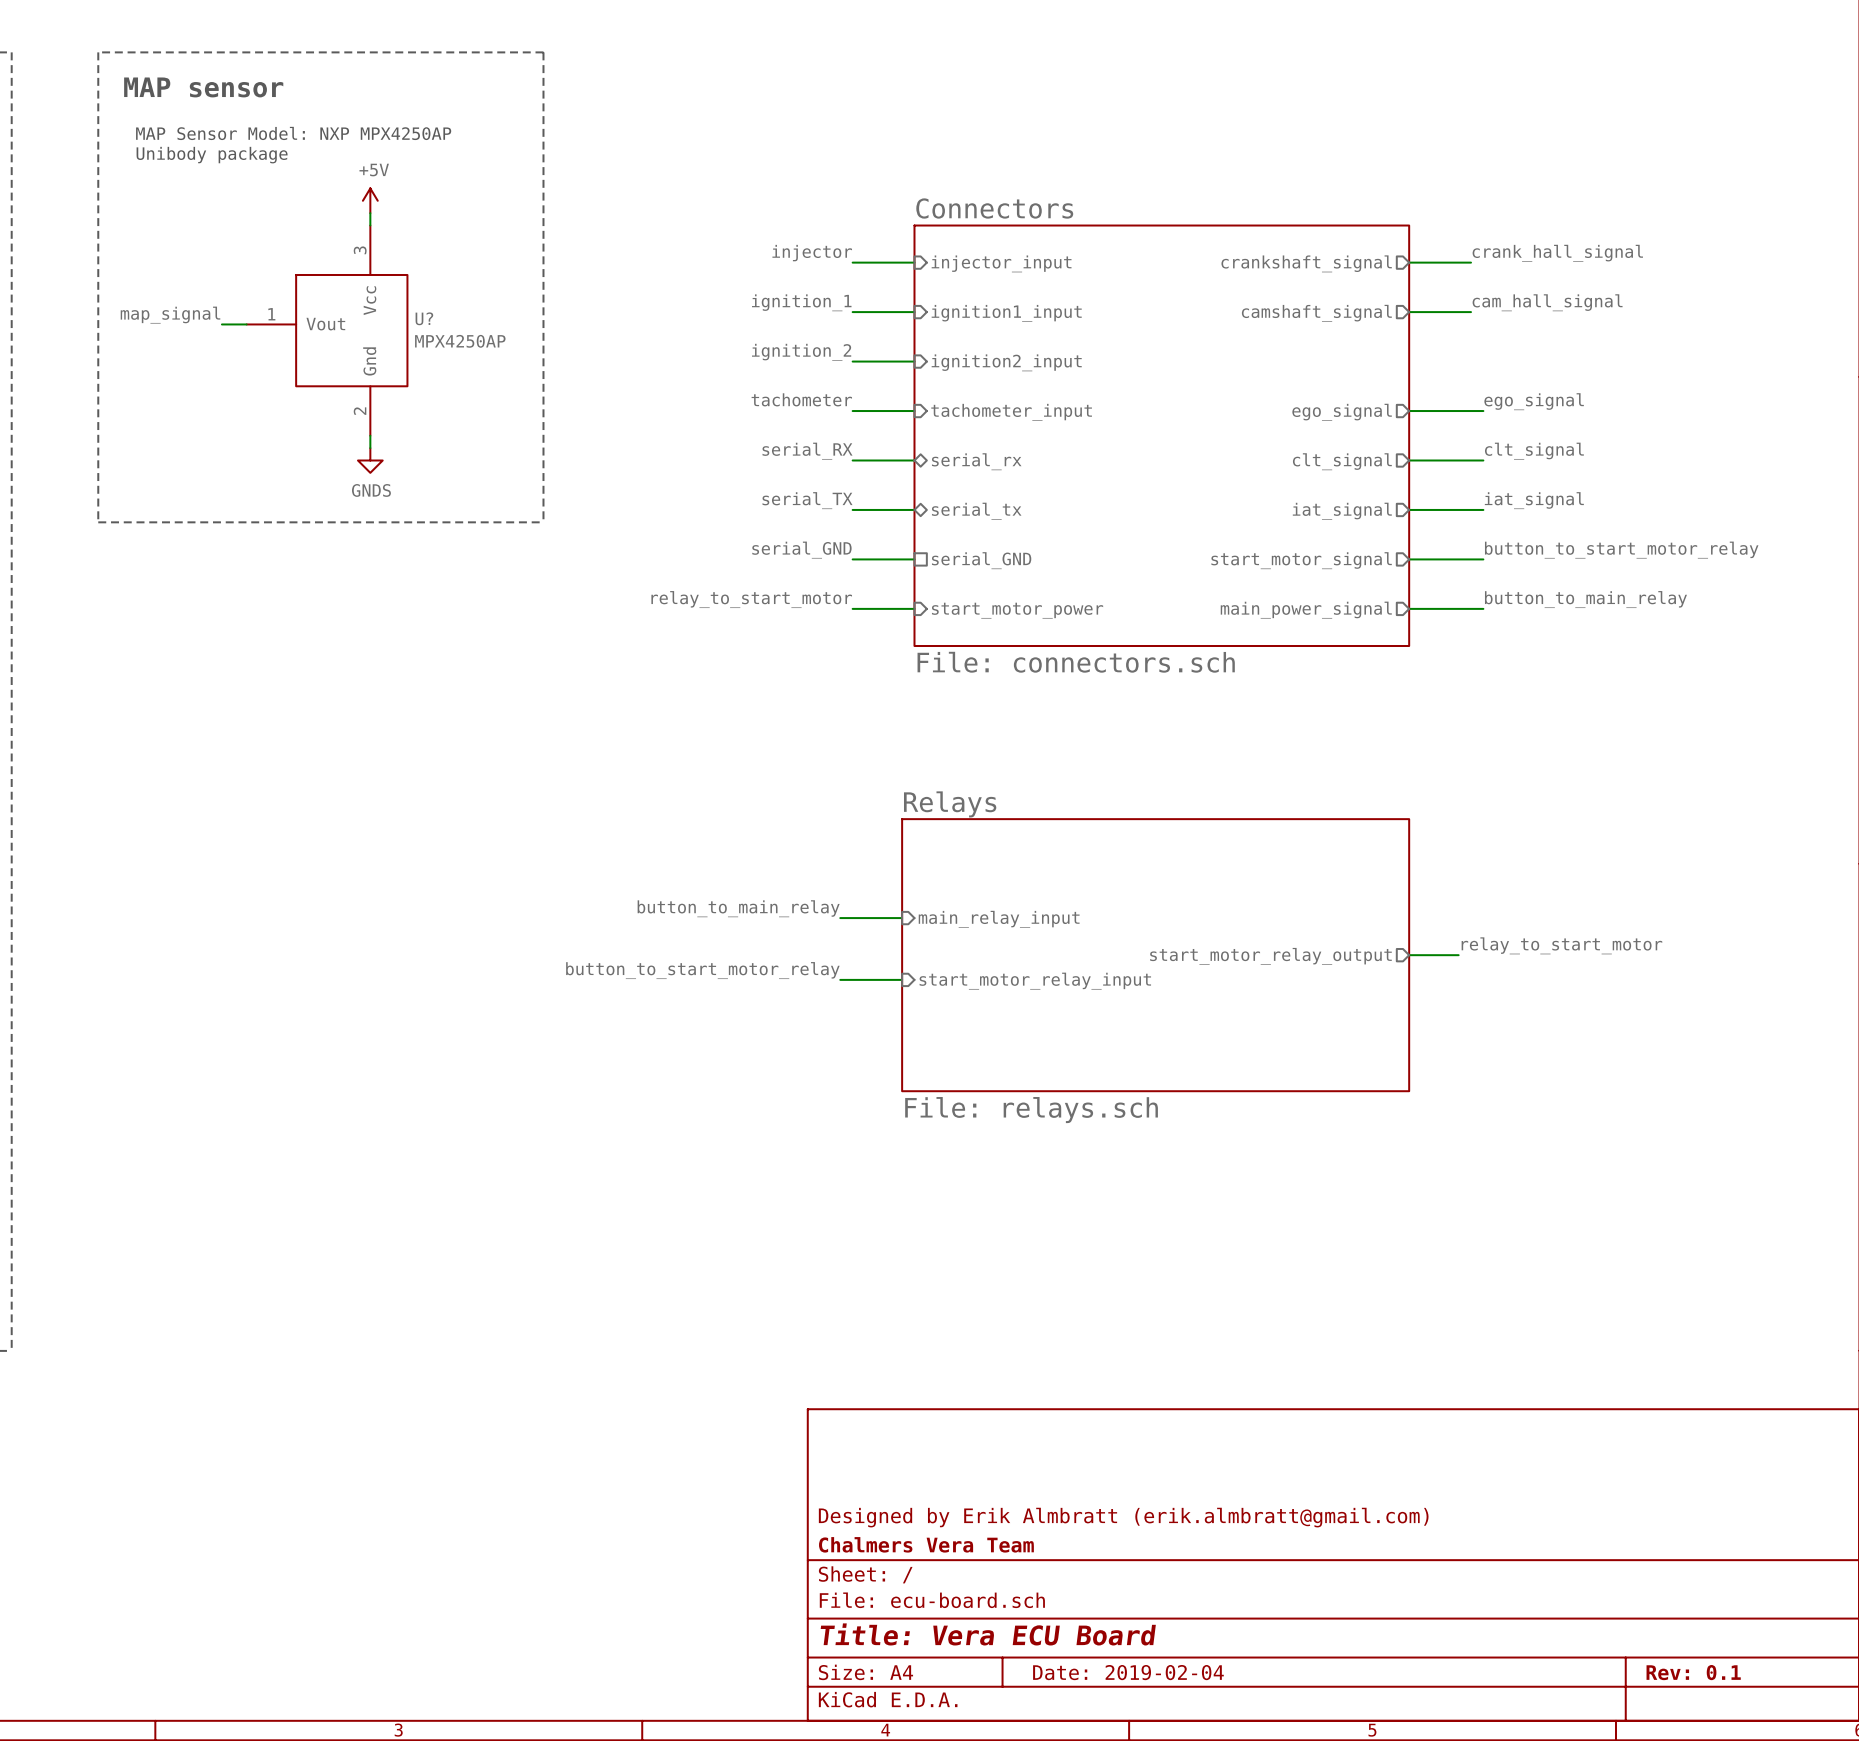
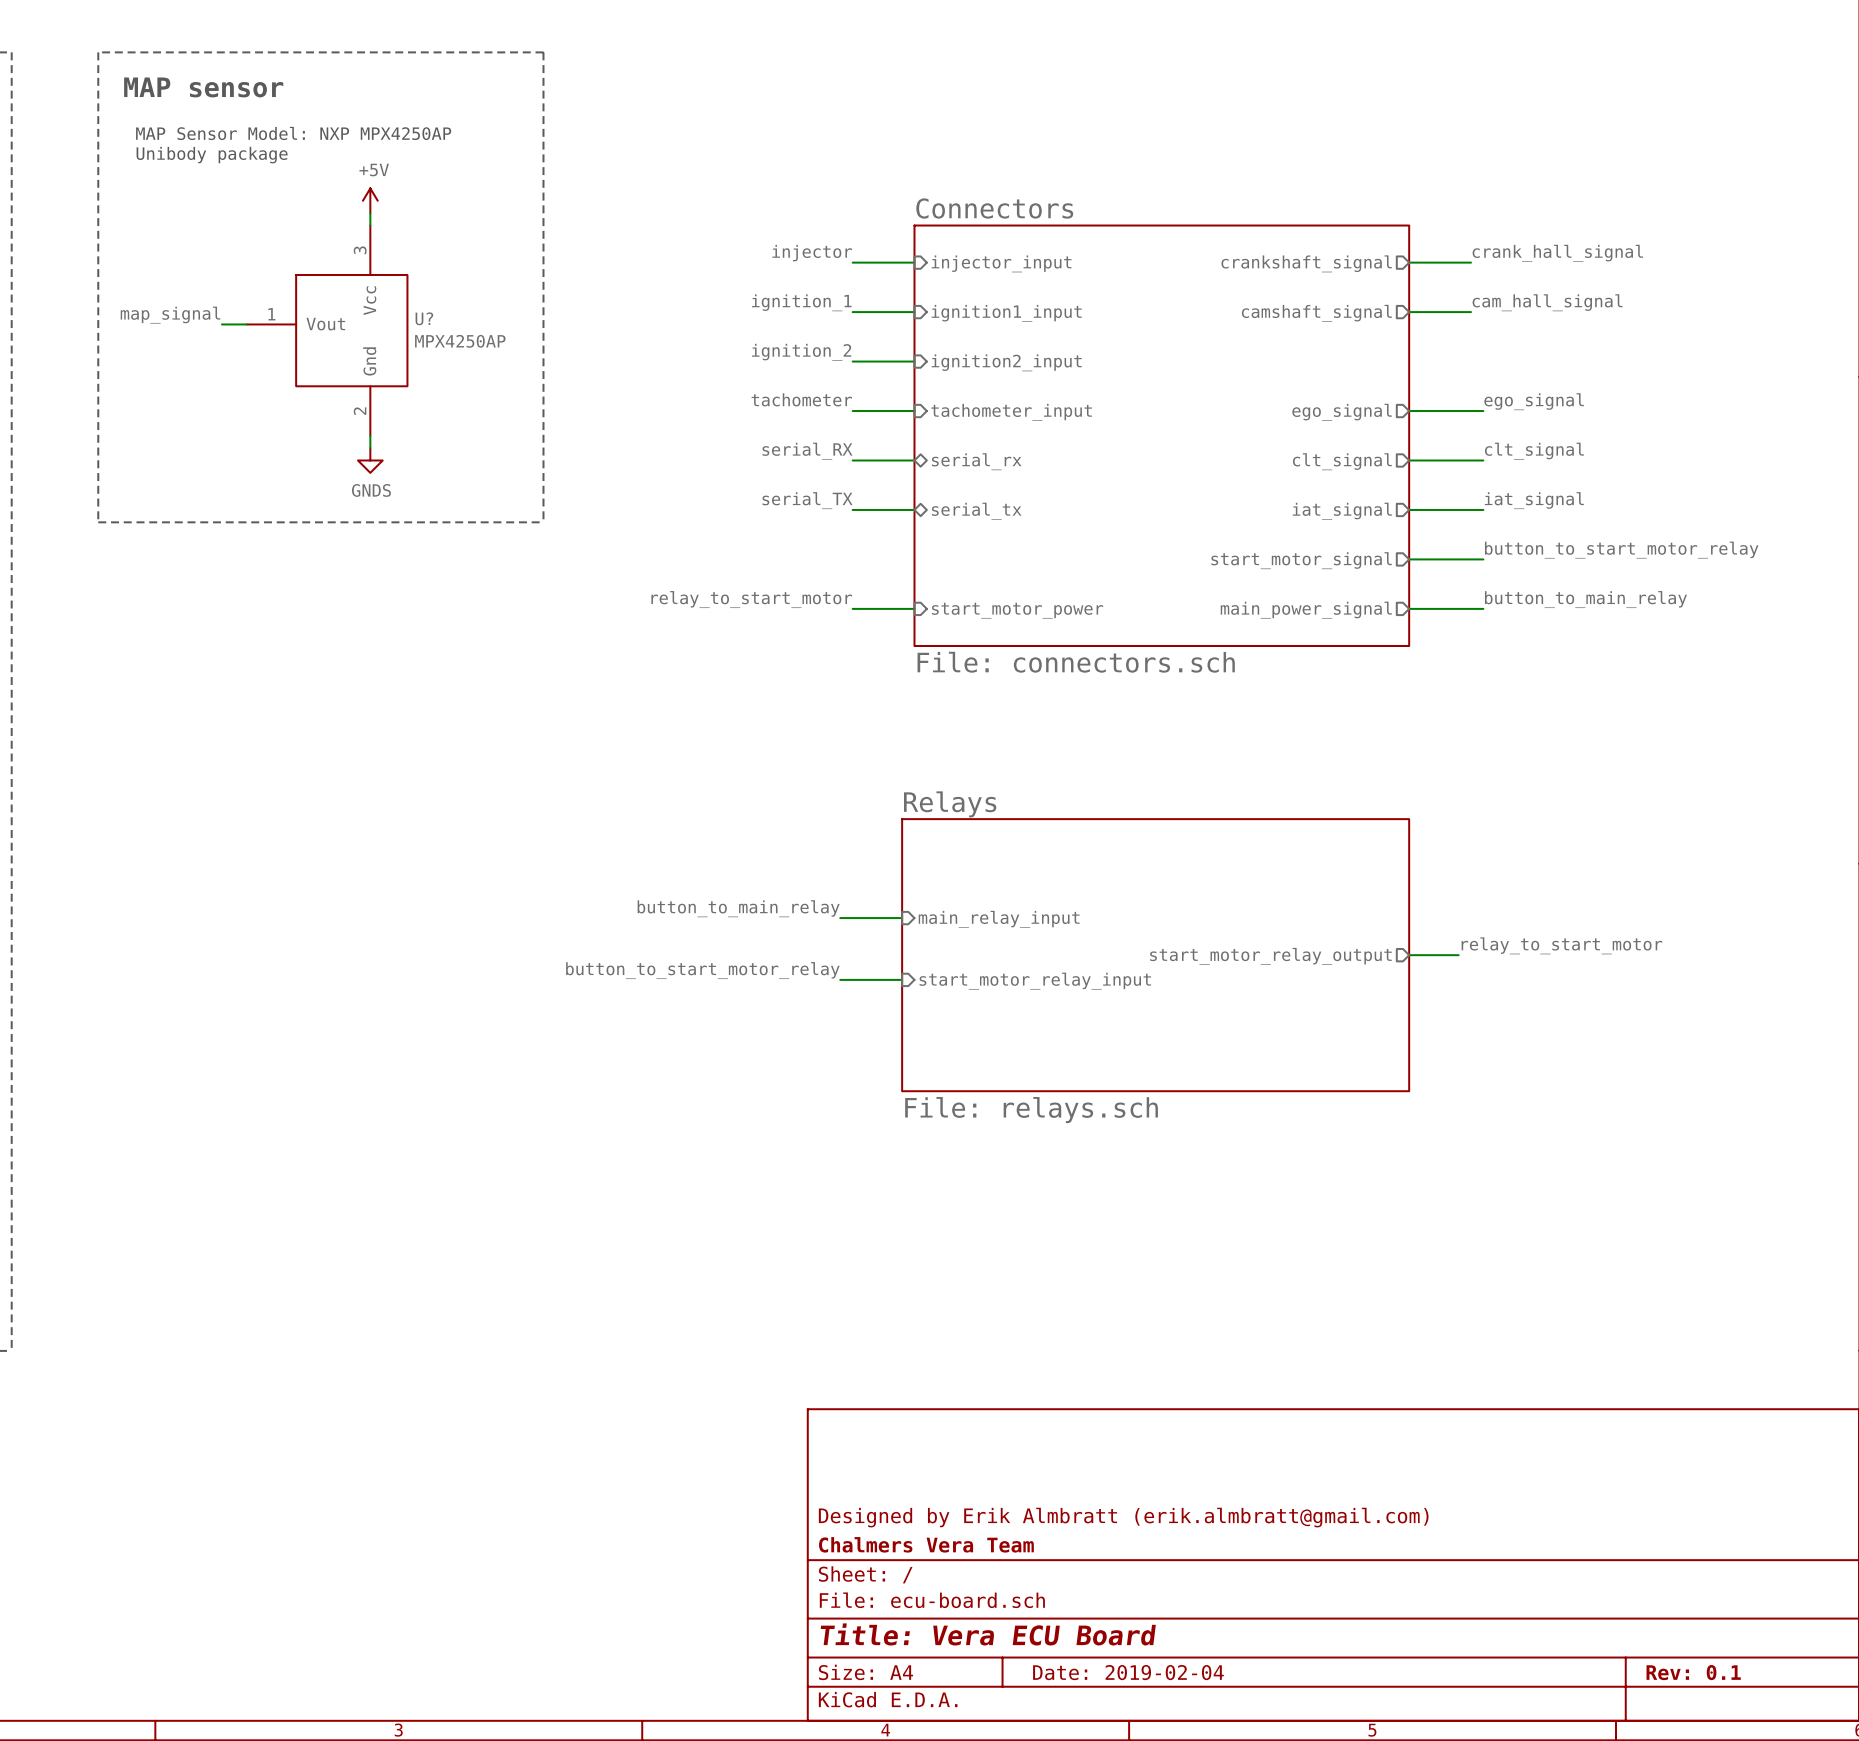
label: serial_GND (801, 550) -> none
wire: (852, 559) (914, 559) -> none
sheet pin: serial_GND (981, 560) -> none

